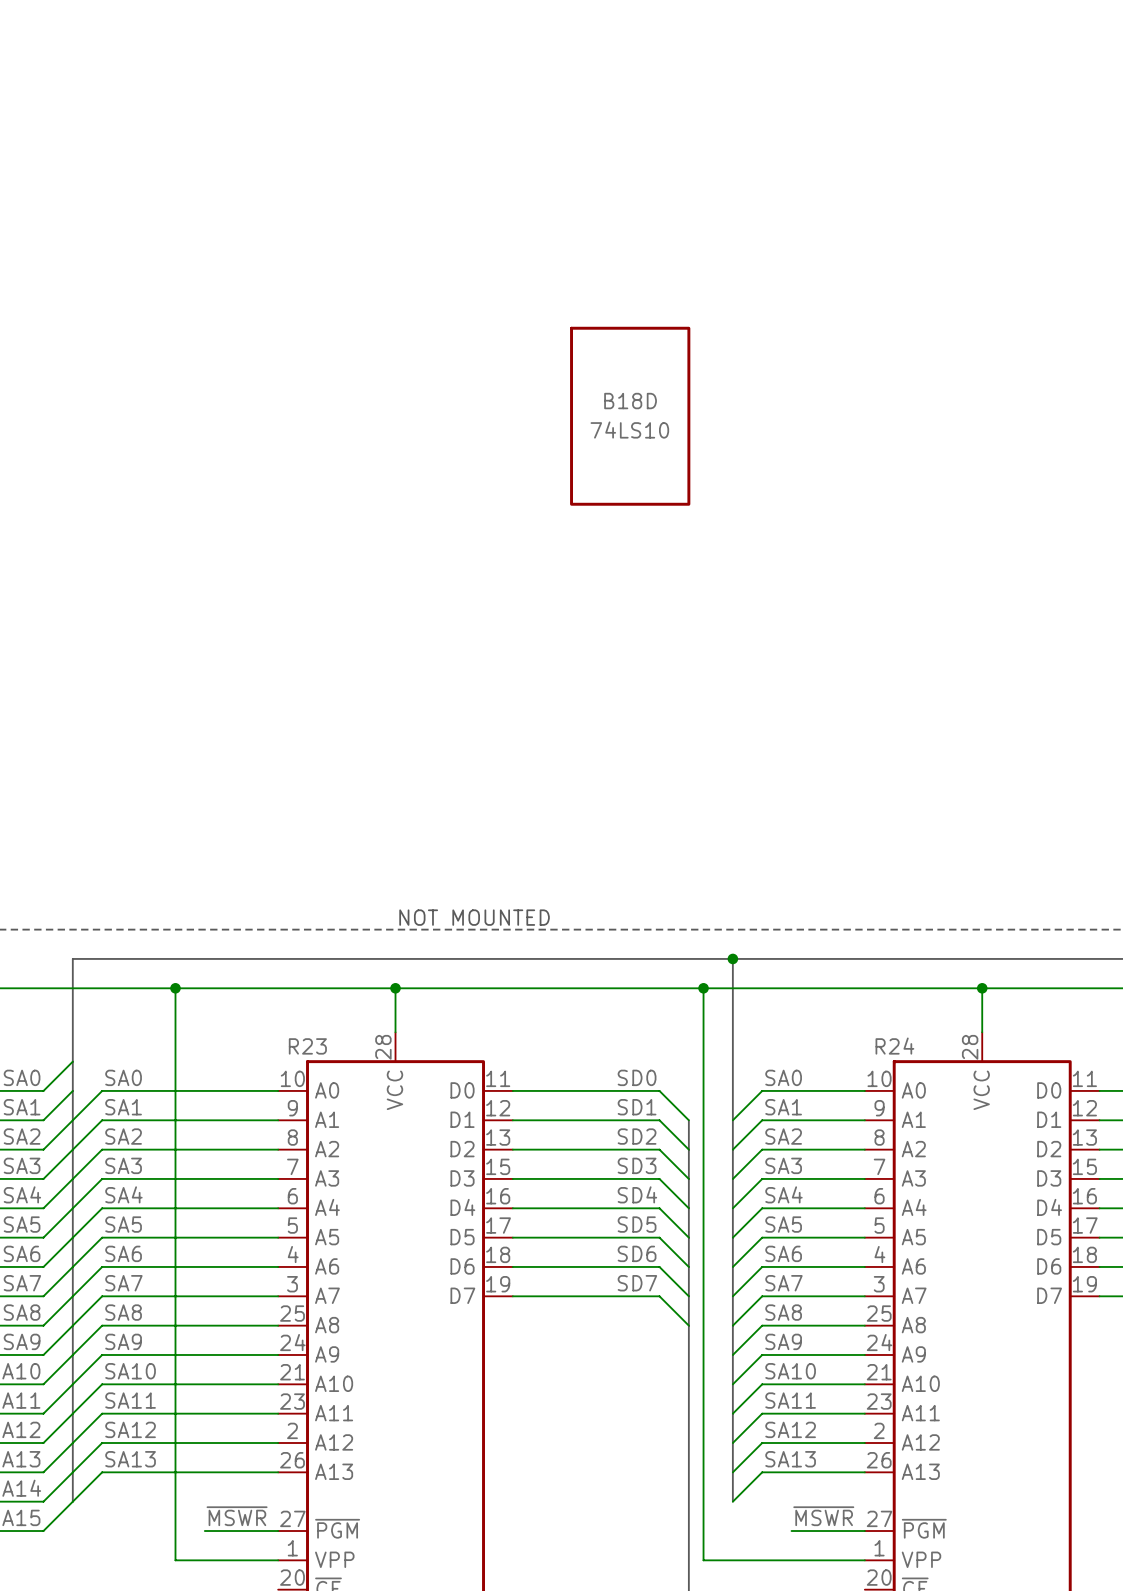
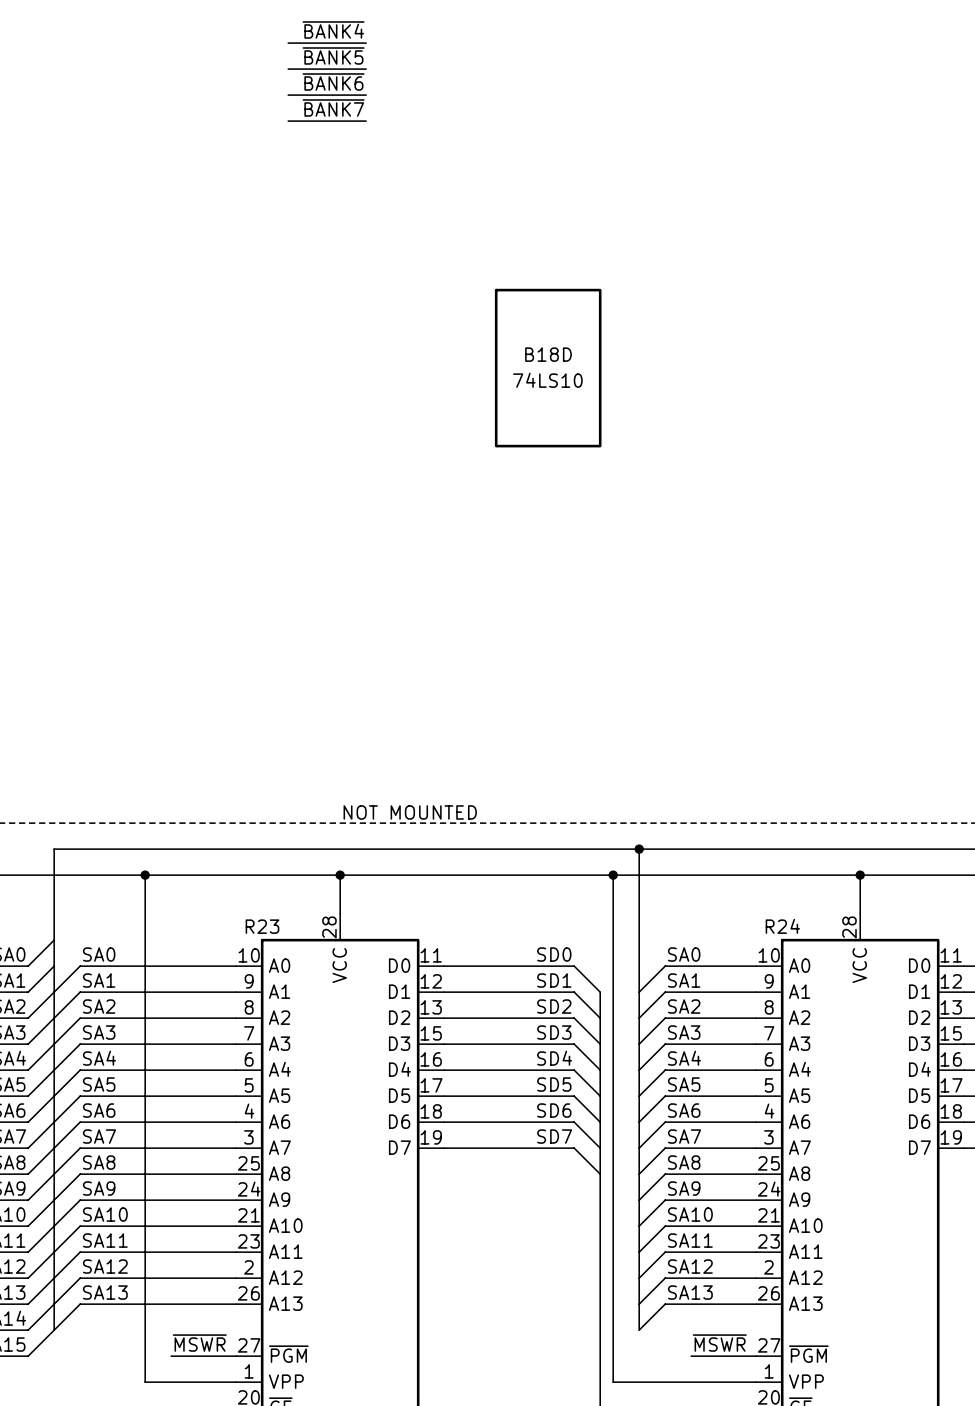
label: none -> ~{BANK4} (333, 29)
wire: none -> (288, 43) (366, 43)
label: none -> ~{BANK5} (333, 55)
wire: none -> (288, 69) (366, 69)
label: none -> ~{BANK6} (333, 81)
wire: none -> (288, 95) (366, 95)
label: none -> ~{BANK7} (333, 107)
wire: none -> (288, 121) (366, 121)

